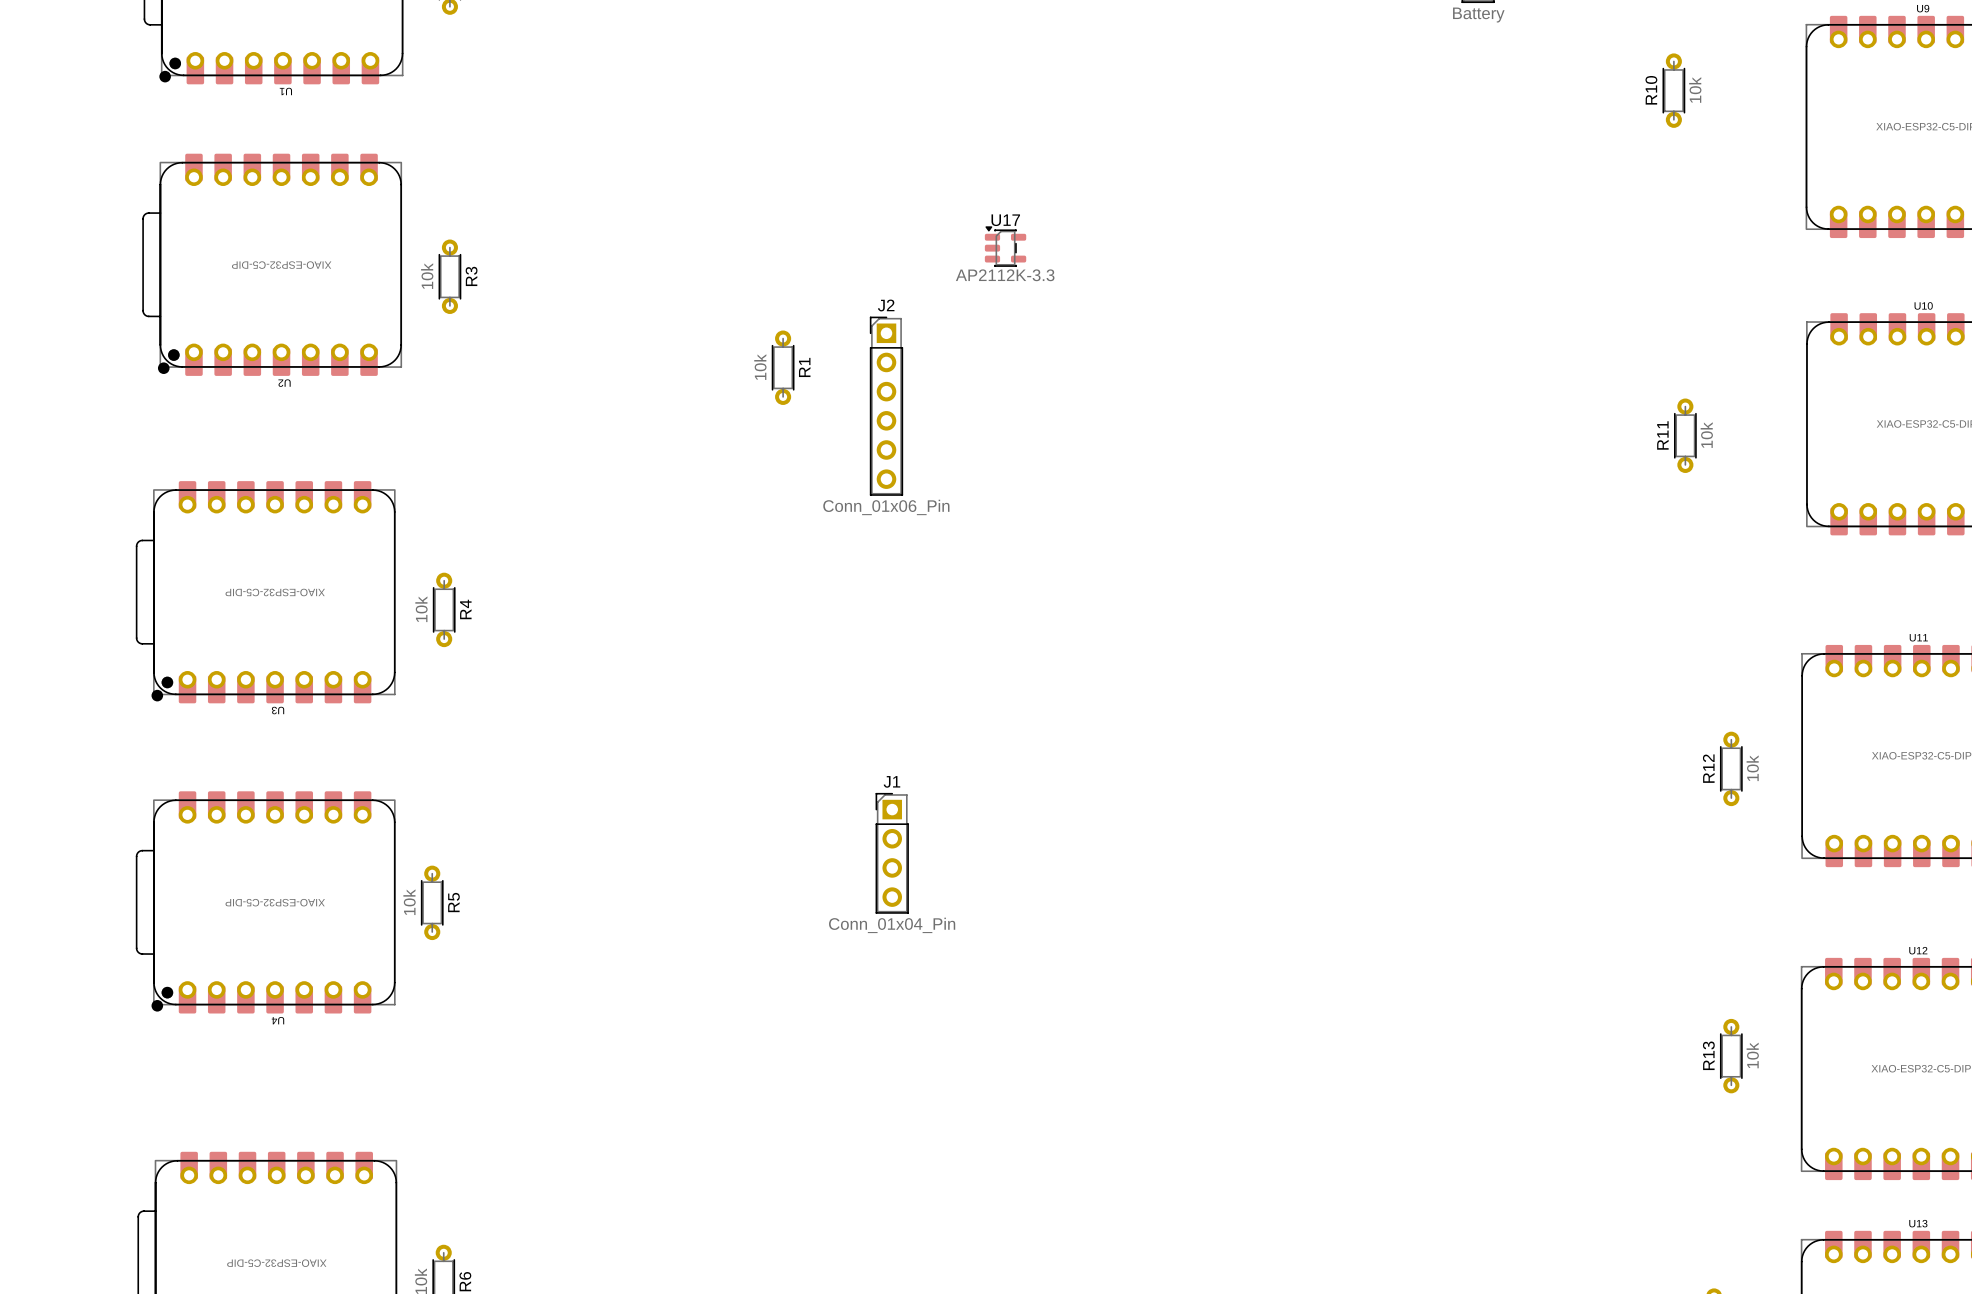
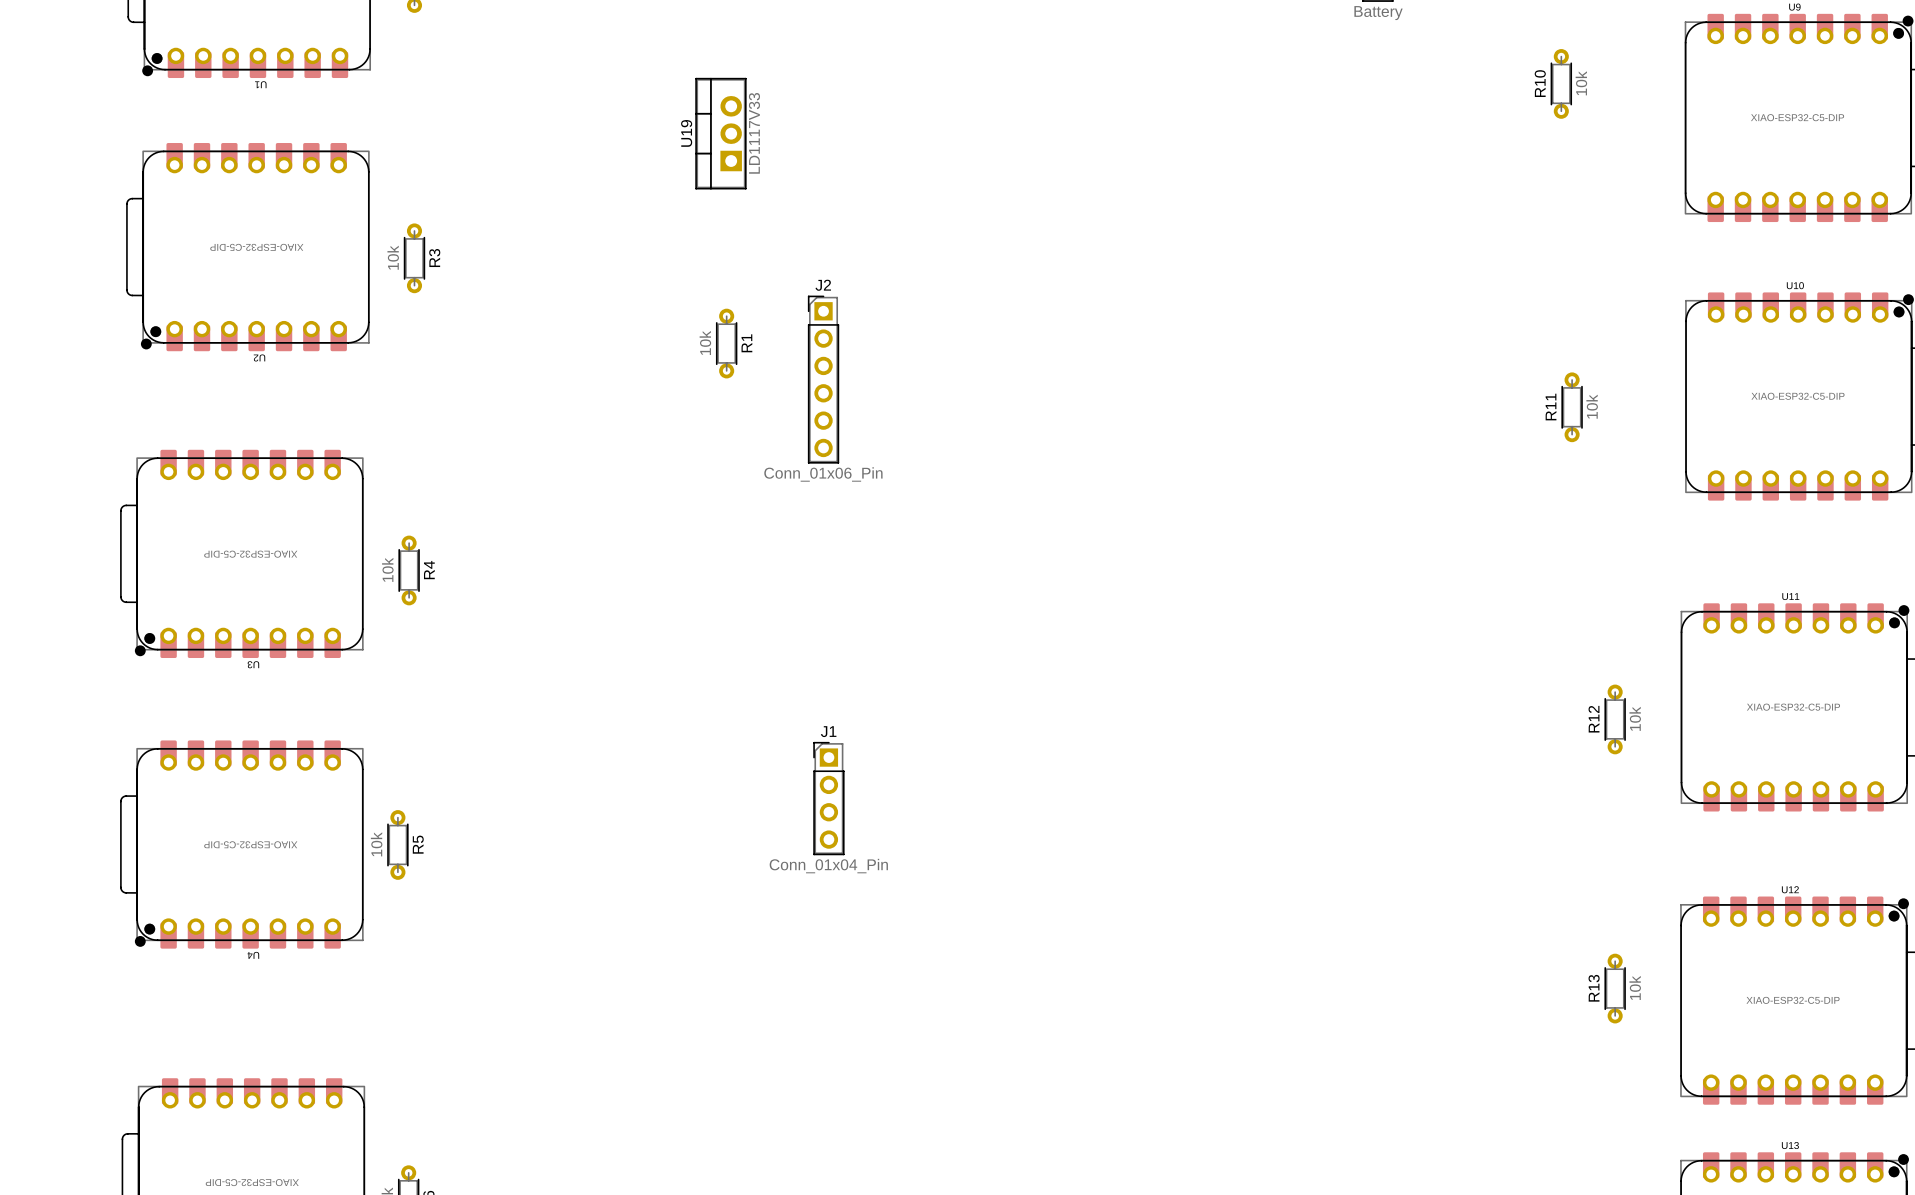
U19: none -> LD1117V33 (720, 133)
U17: AP2112K-3.3 (1005, 246) -> none

